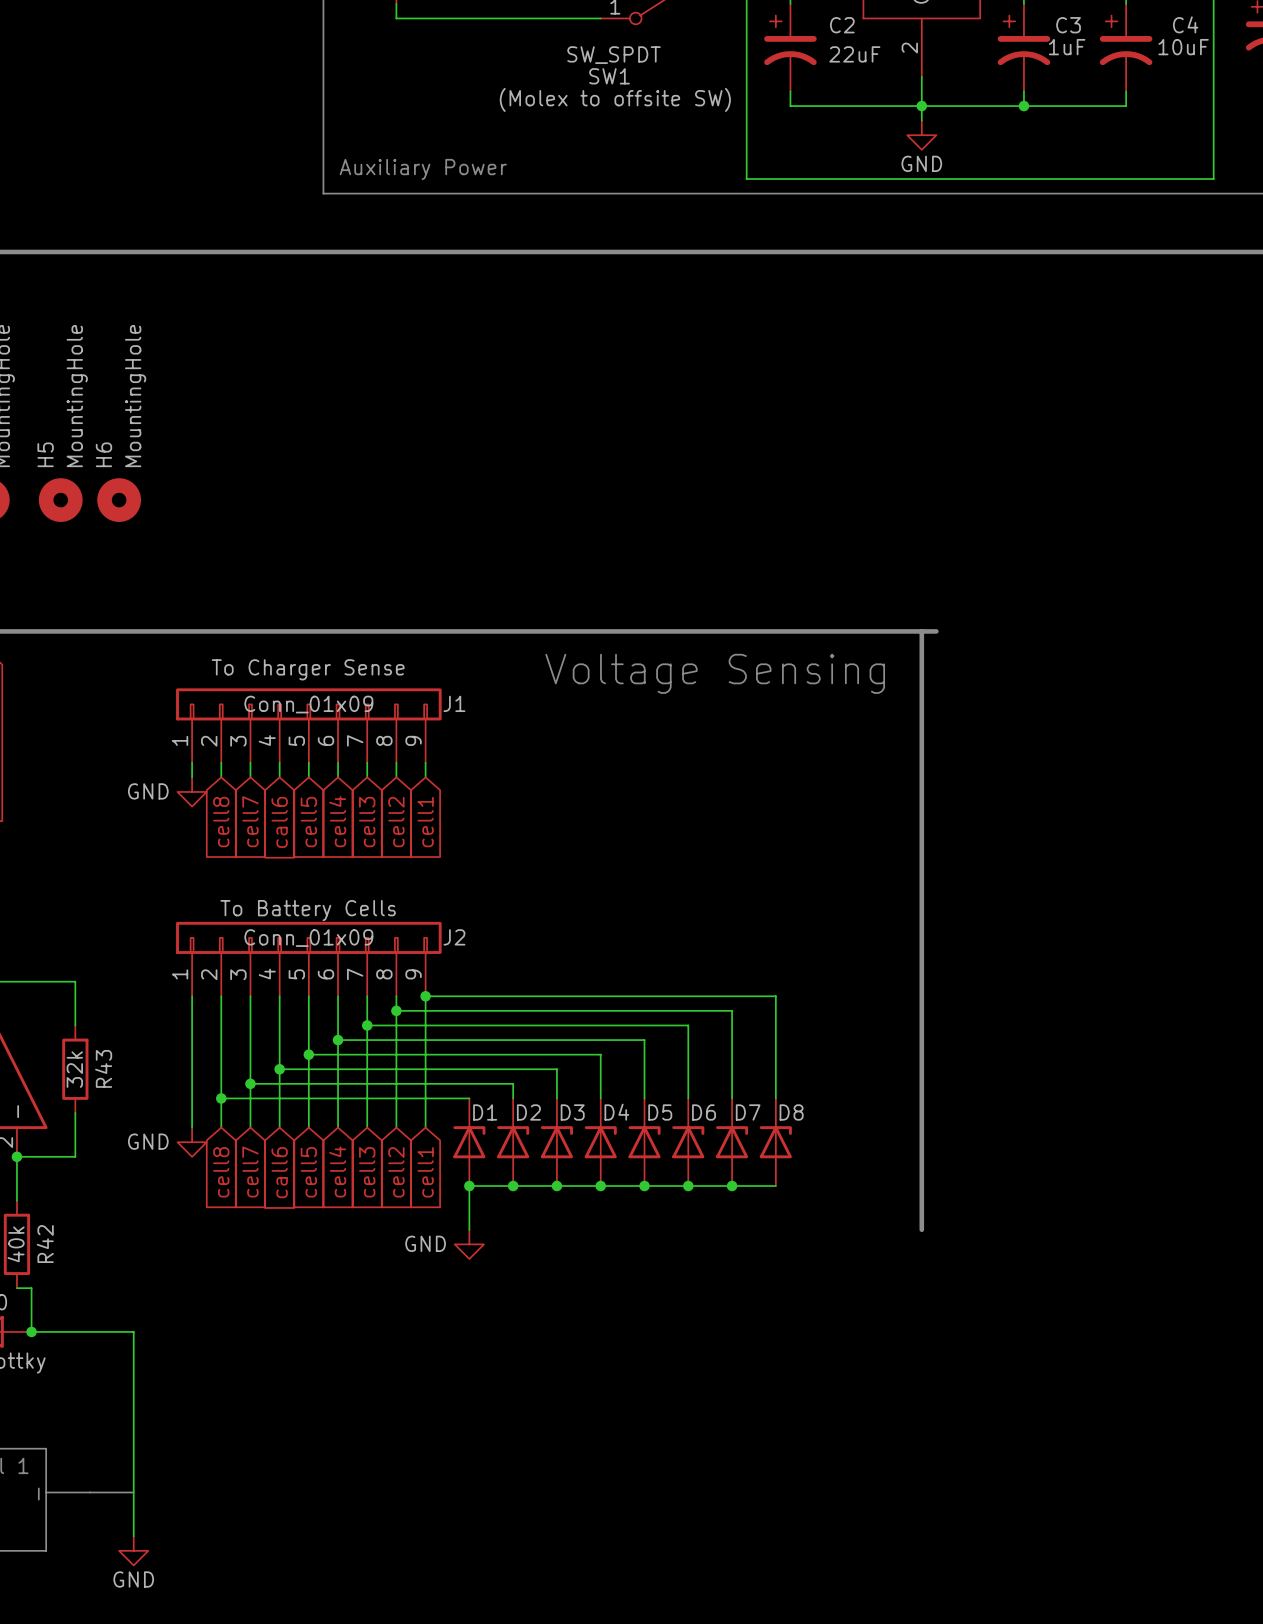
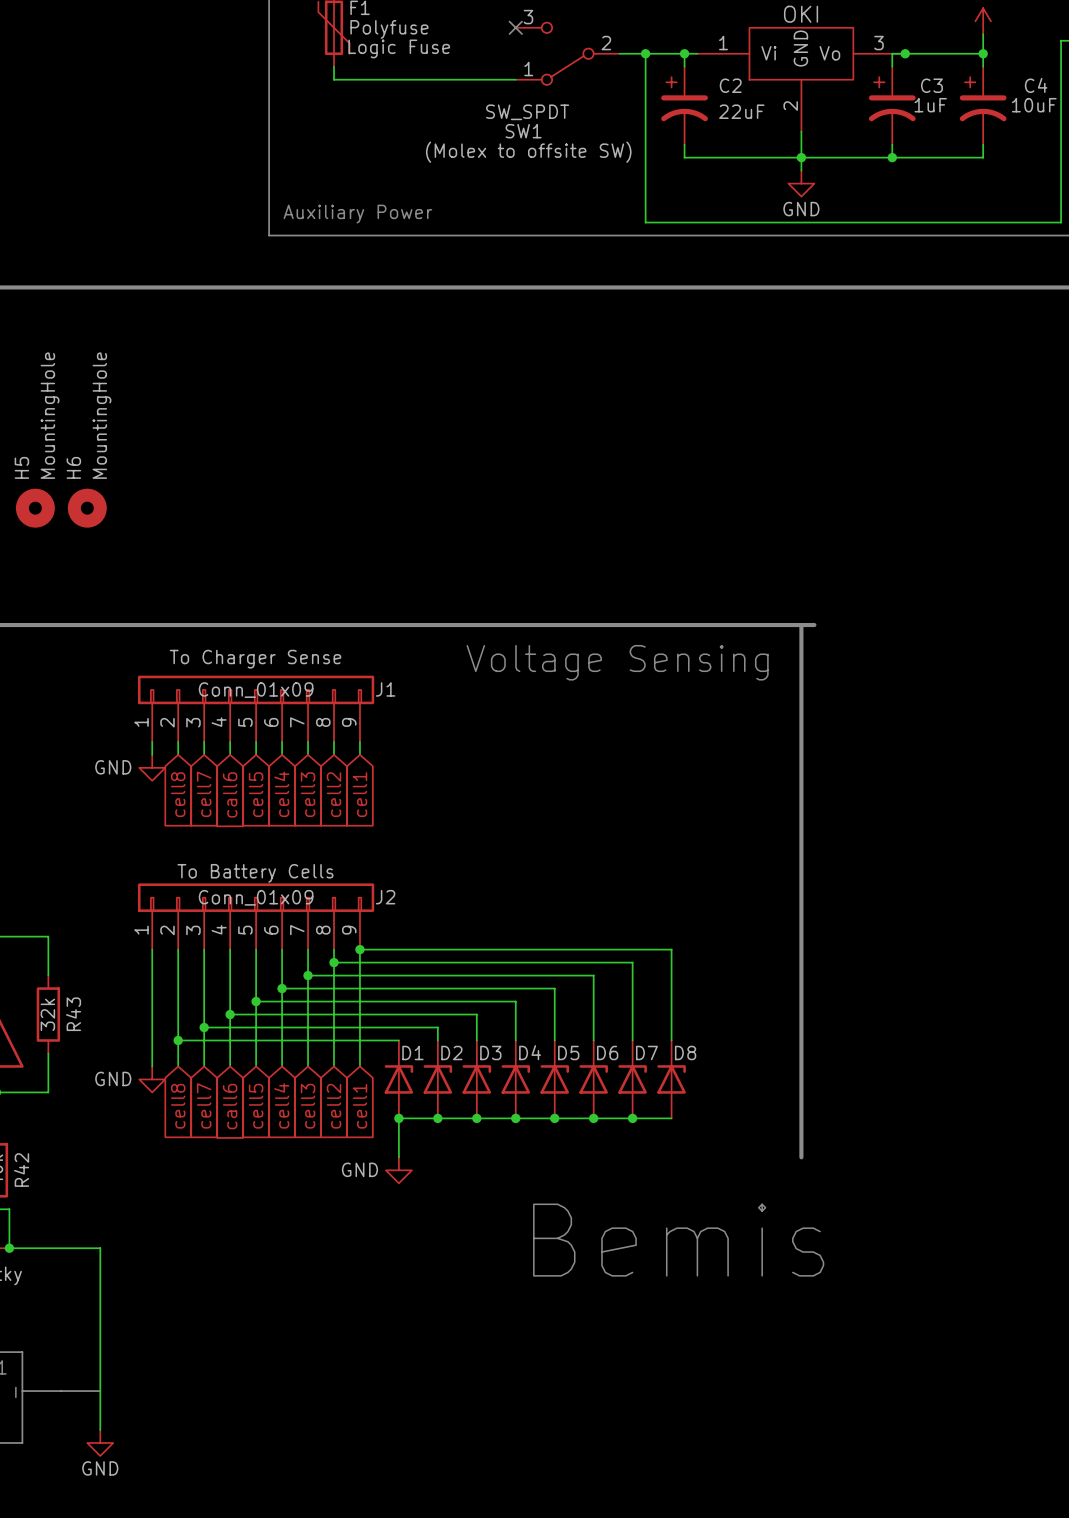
text: none -> Bemis (678, 1240)

